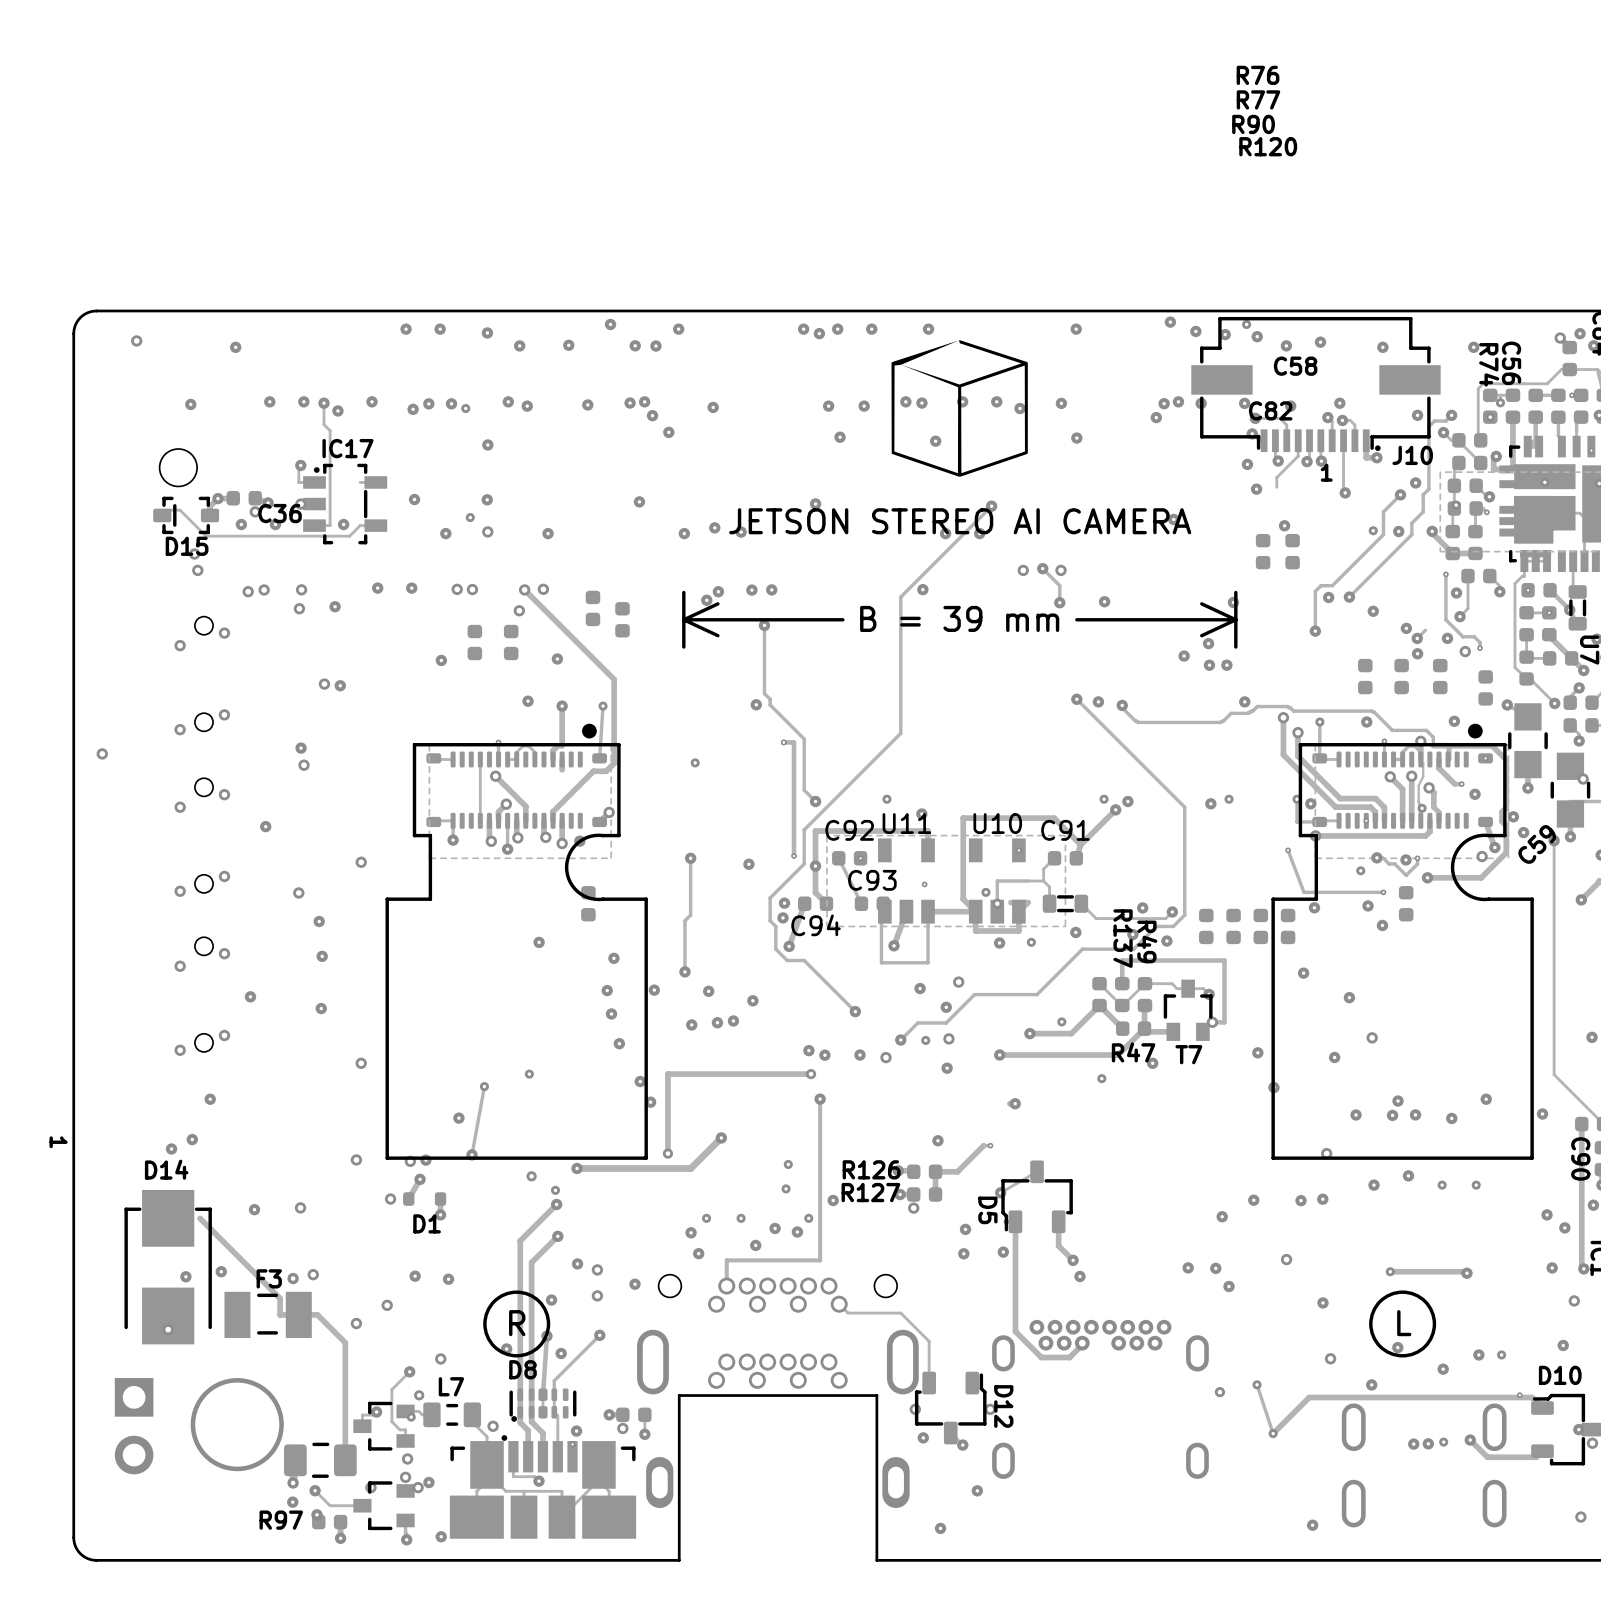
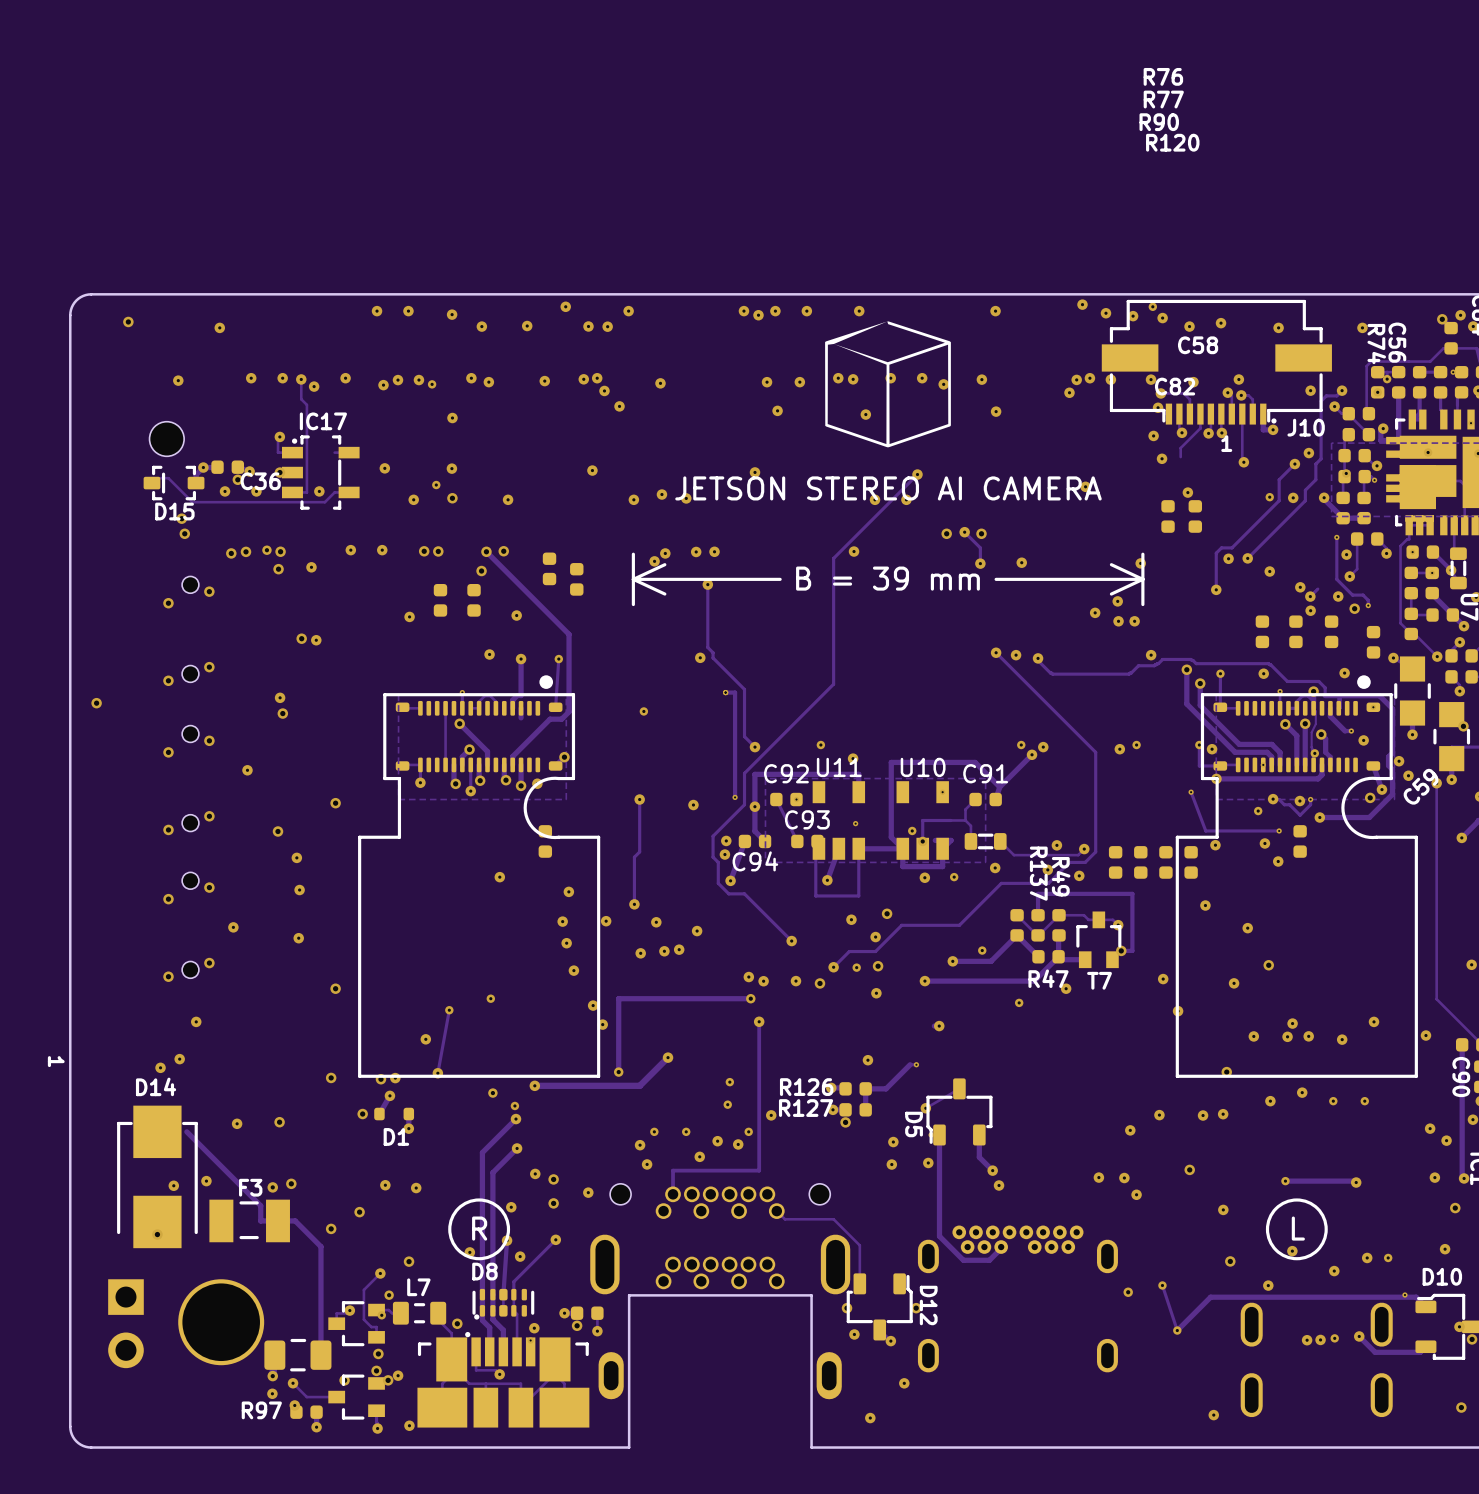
via: none -> (266, 550)

